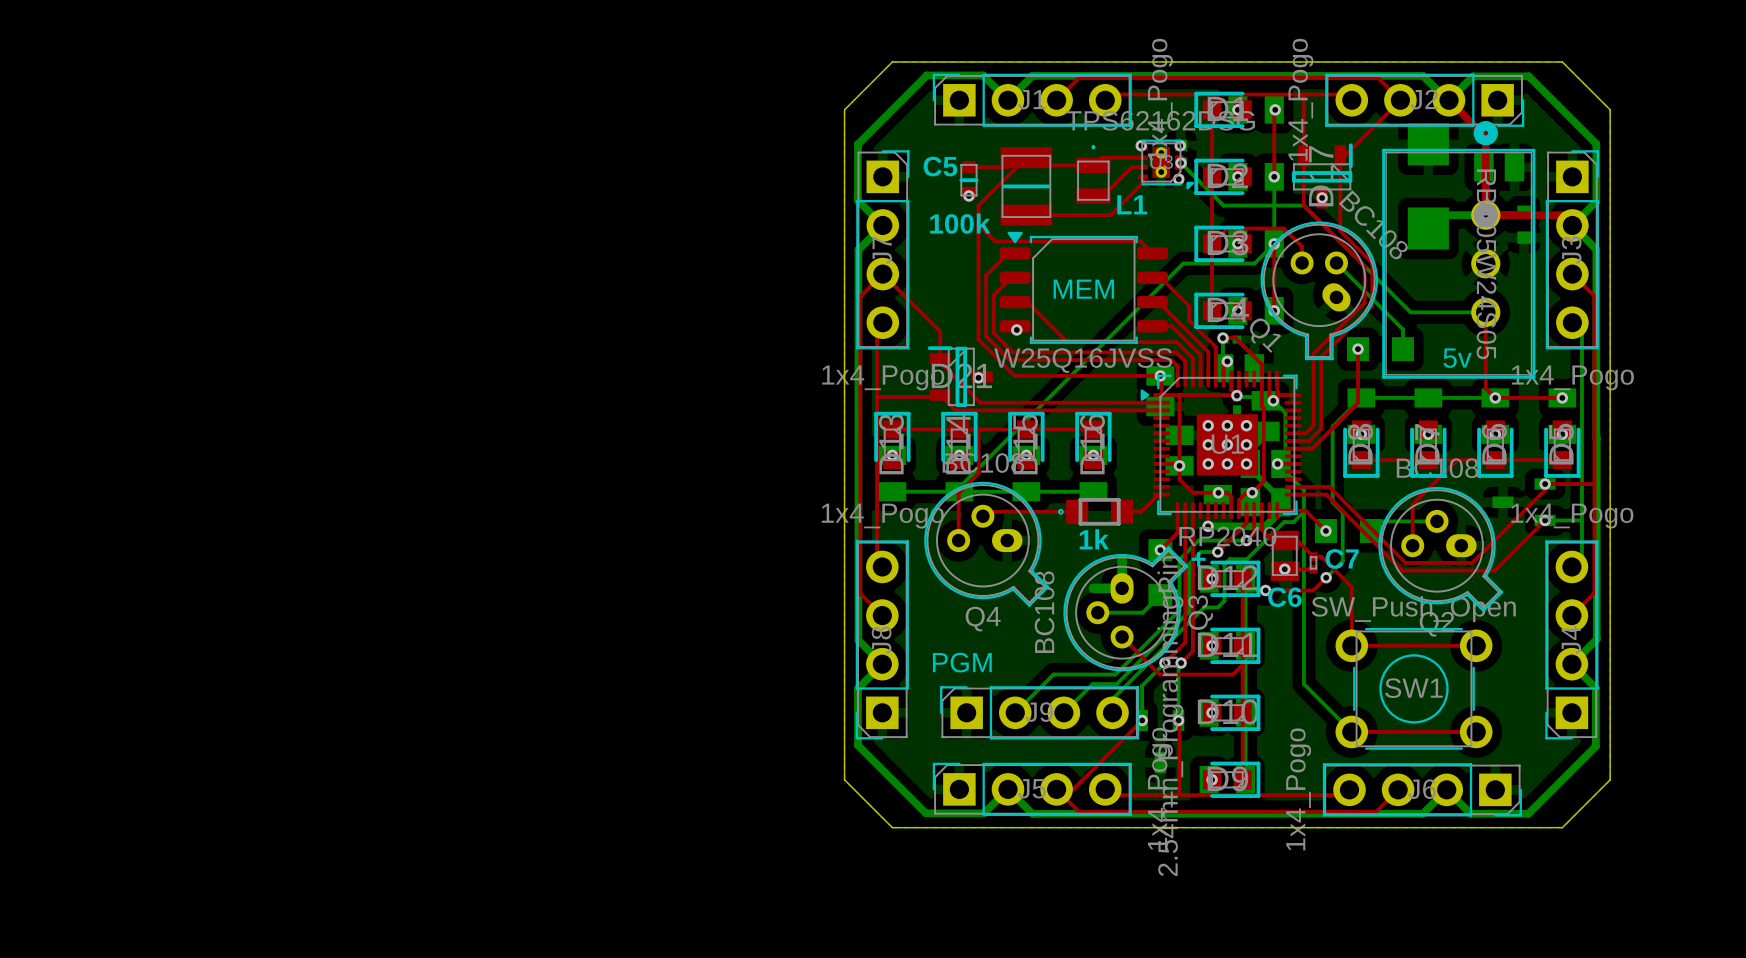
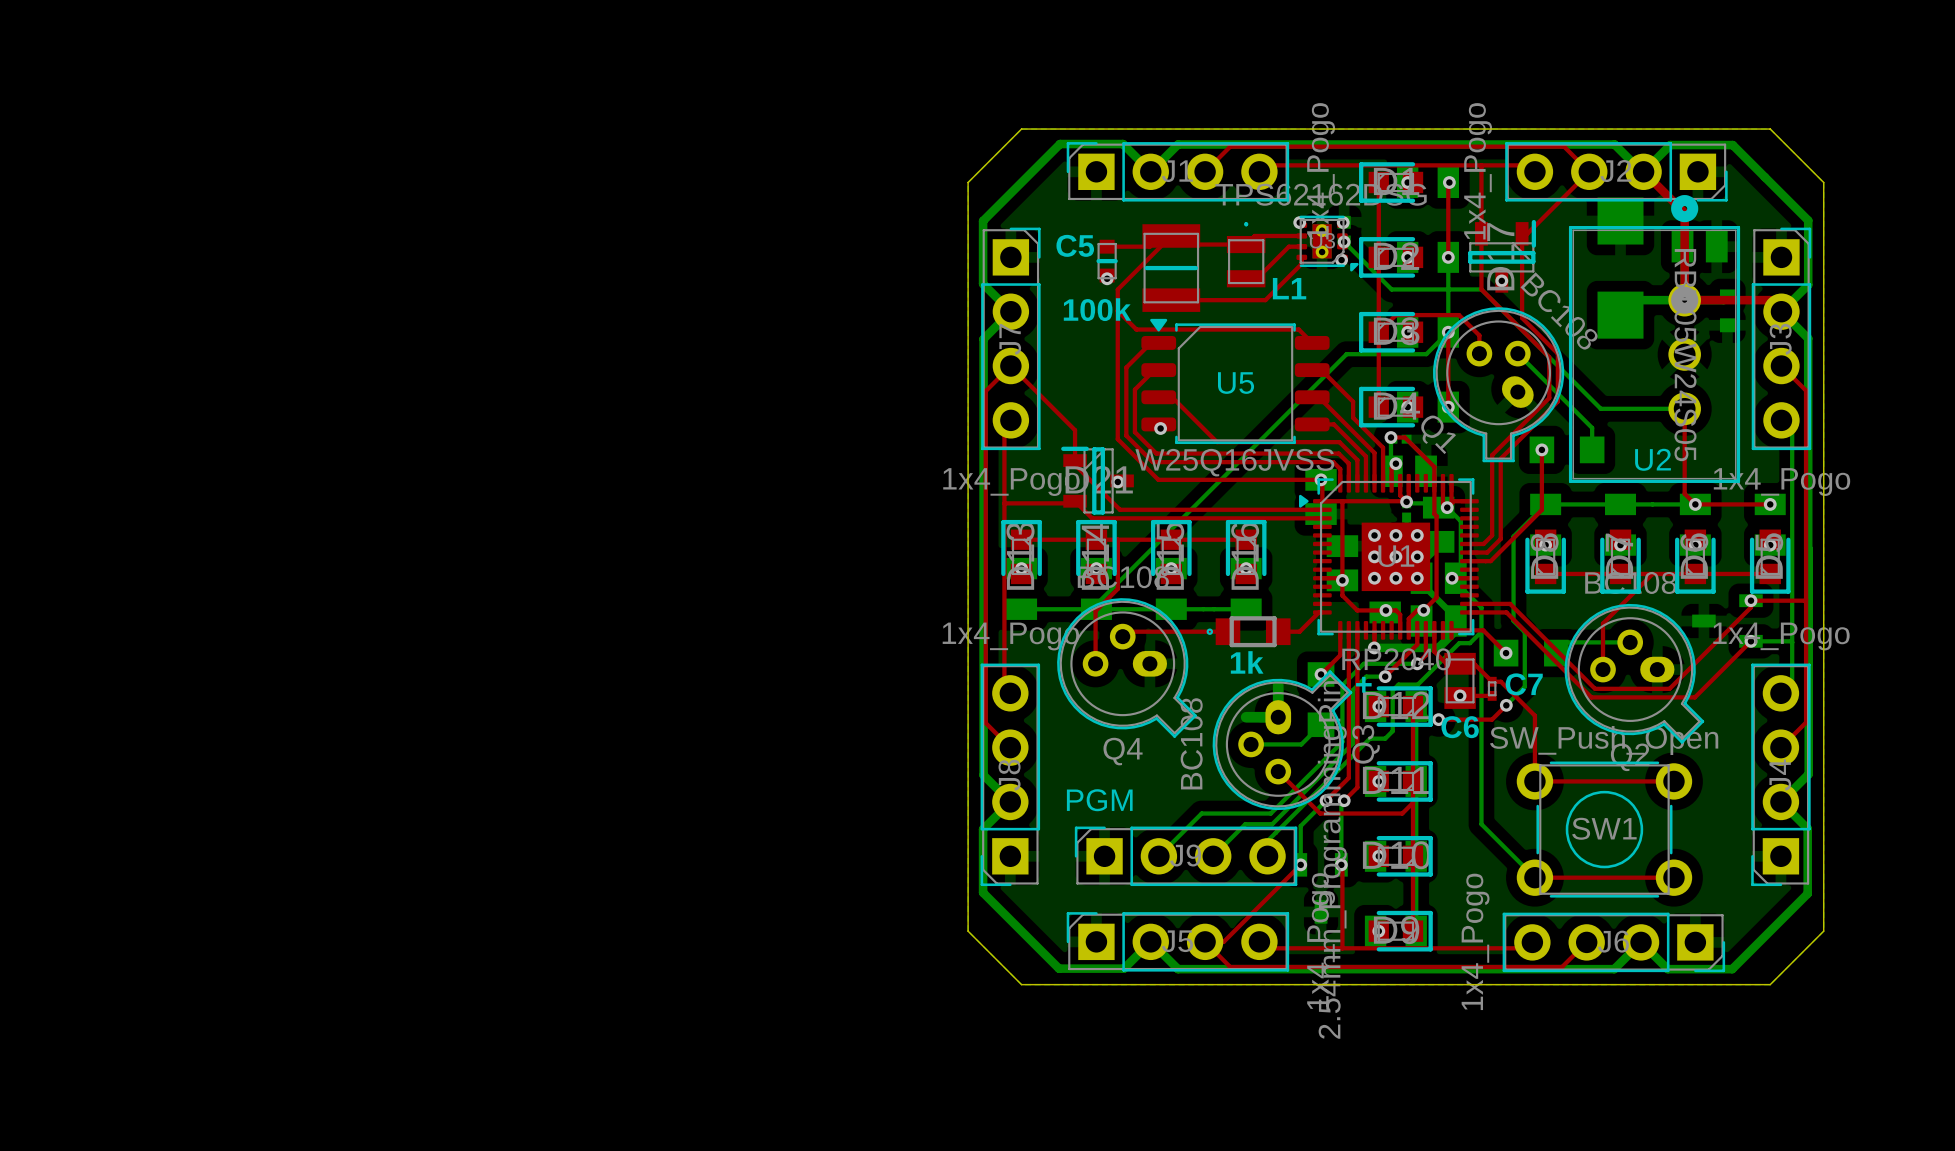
MEM name: MEM (1083, 289) -> U5 (1236, 383)
5v name: 5v (1457, 358) -> U2 (1653, 459)

